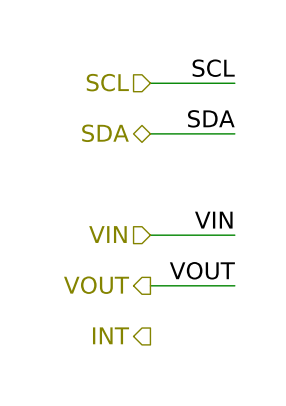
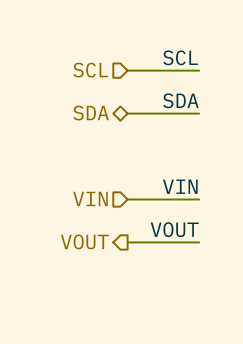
hierarchical label: INT (111, 335) -> none

